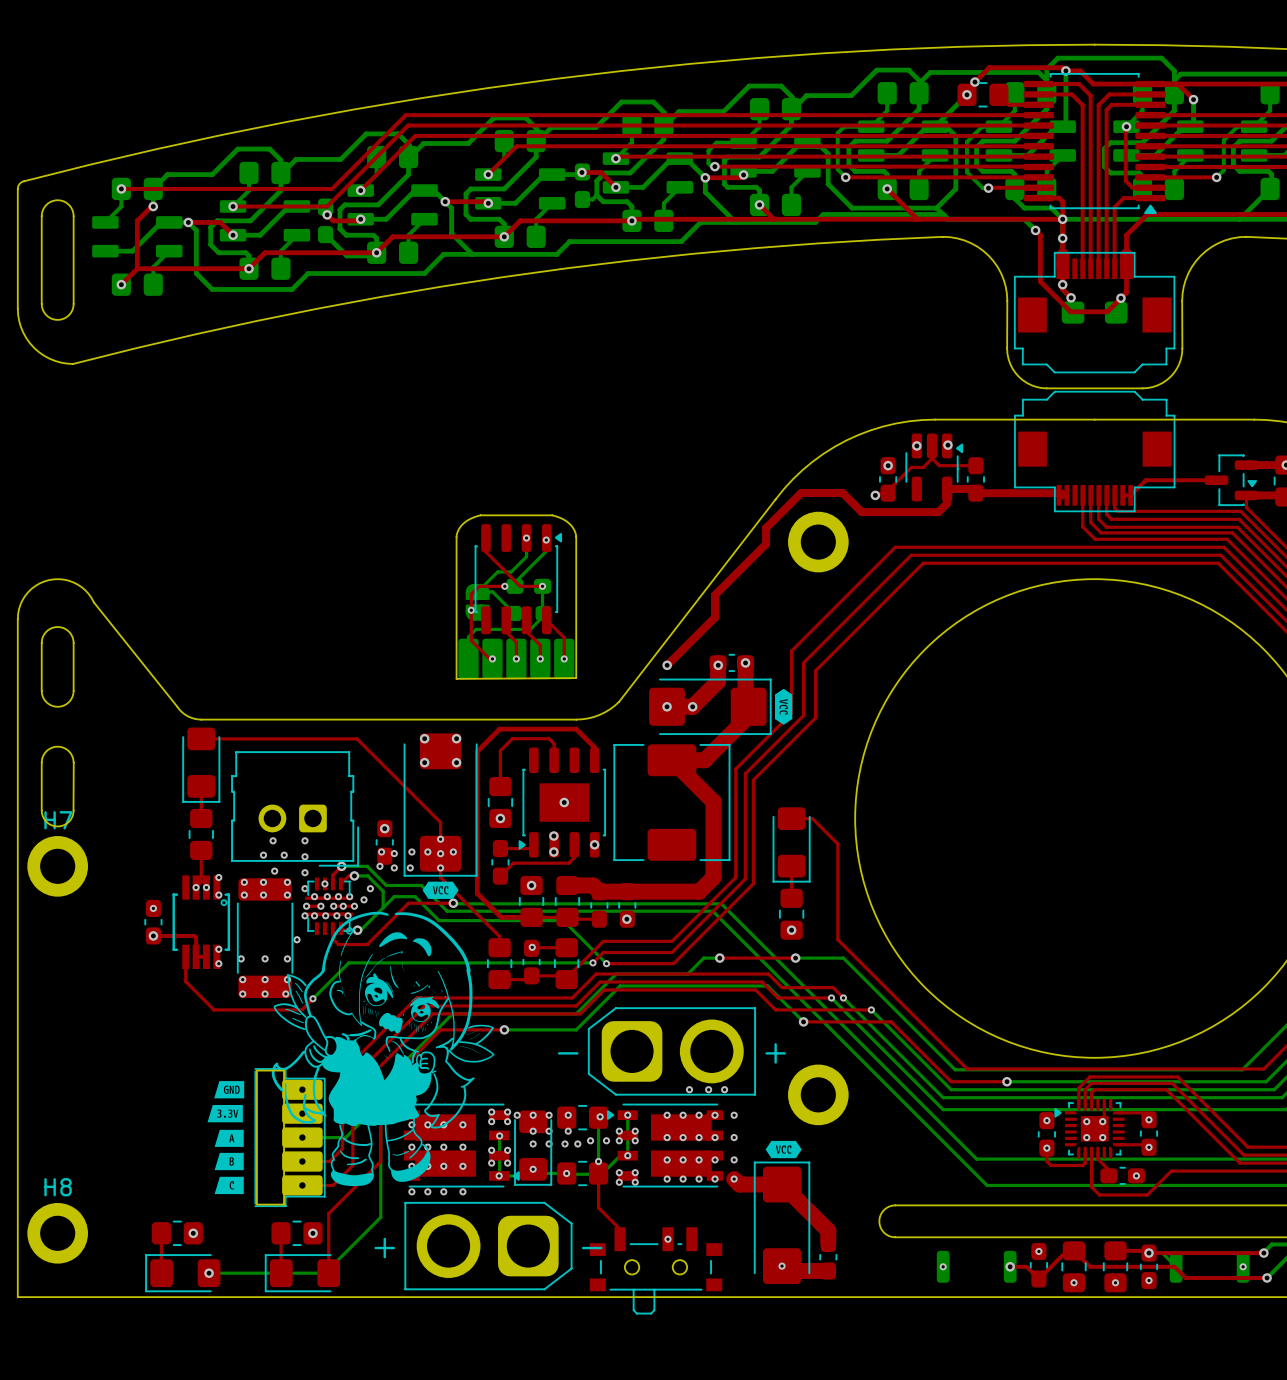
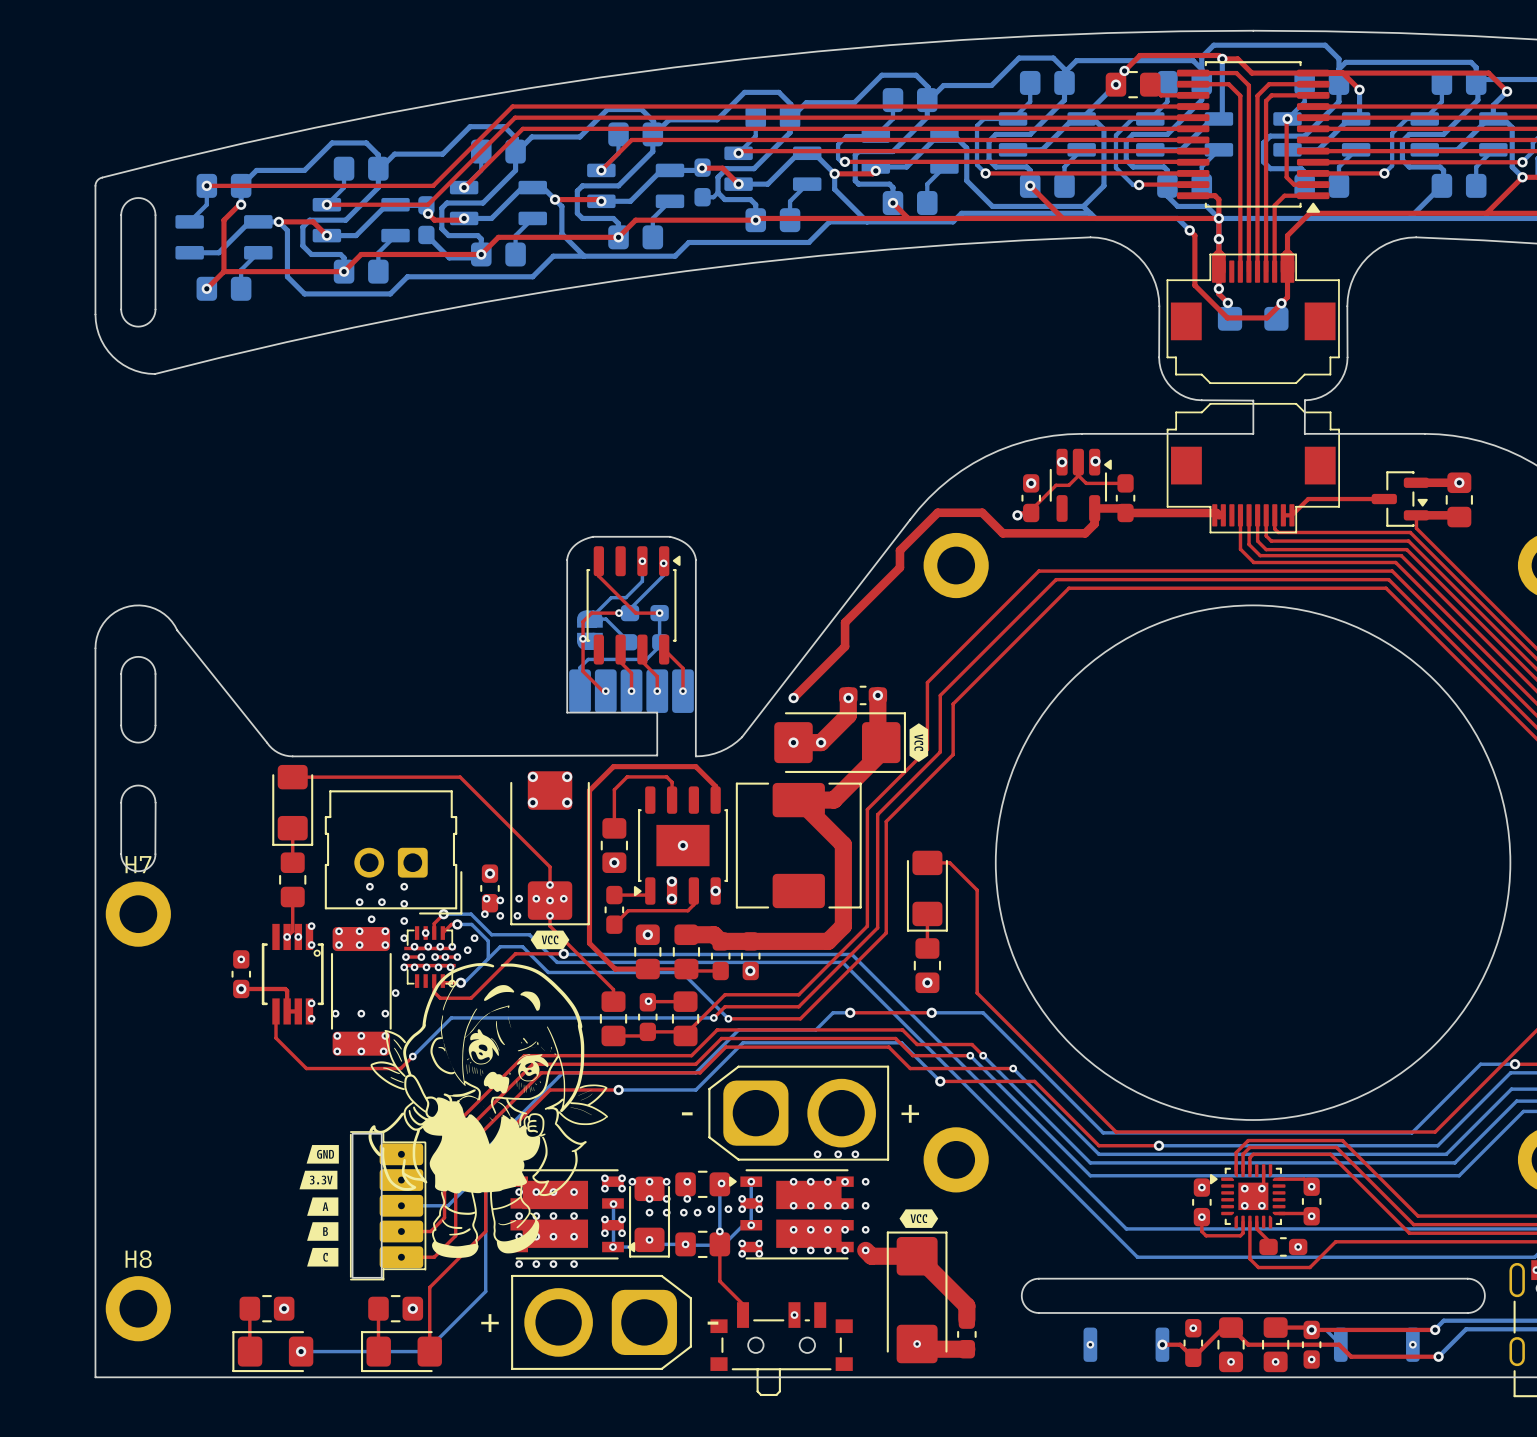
board edge: (1046, 388) (1142, 388) -> (1201, 400) (1253, 400) (1253, 433)
board edge: (1094, 419) (1142, 419) -> (1304, 400) (1304, 433)
board edge: (576, 678) (456, 678) -> (695, 711) (695, 756)
board edge: (201, 719) (576, 719) -> (292, 756) (657, 755) (657, 712) (567, 712)

